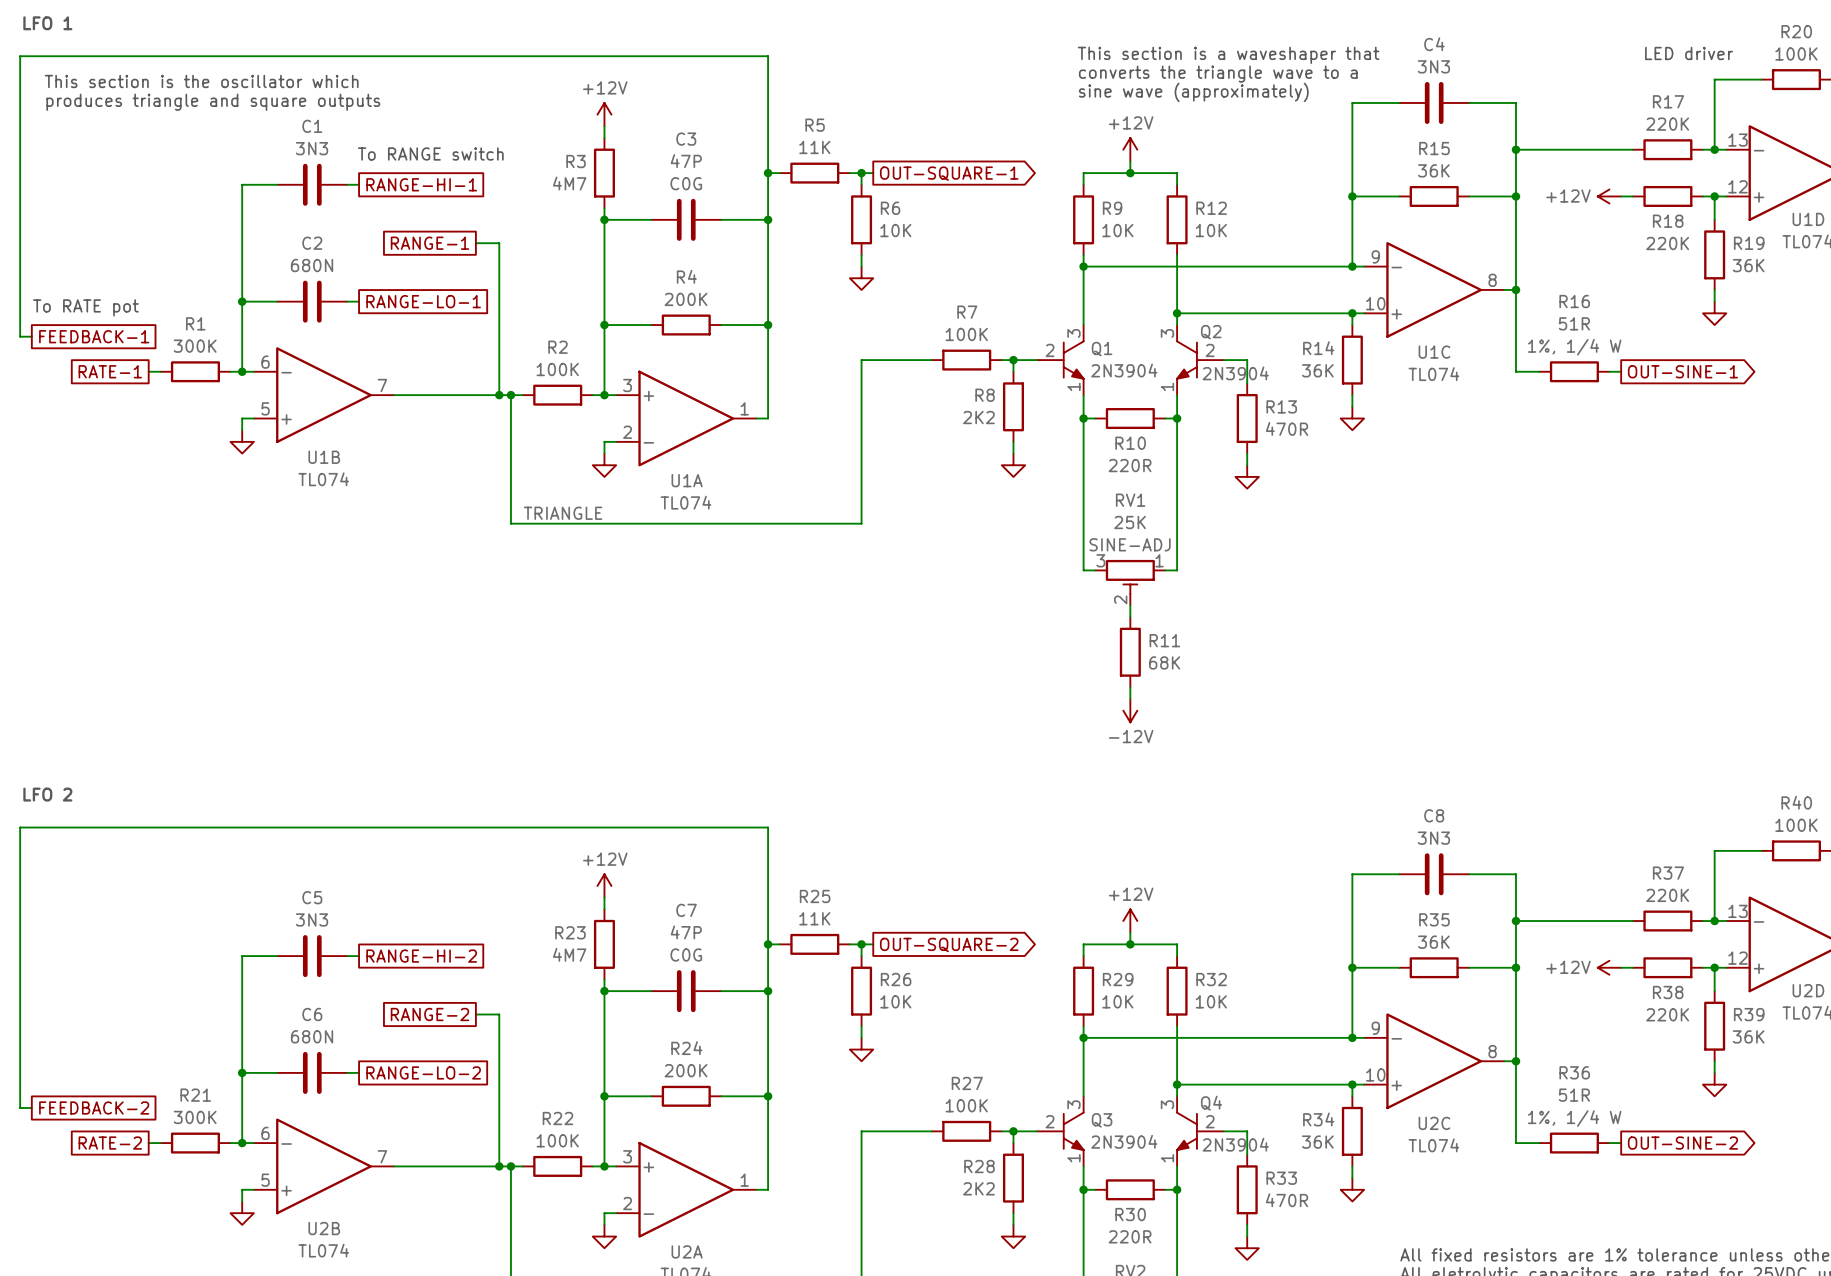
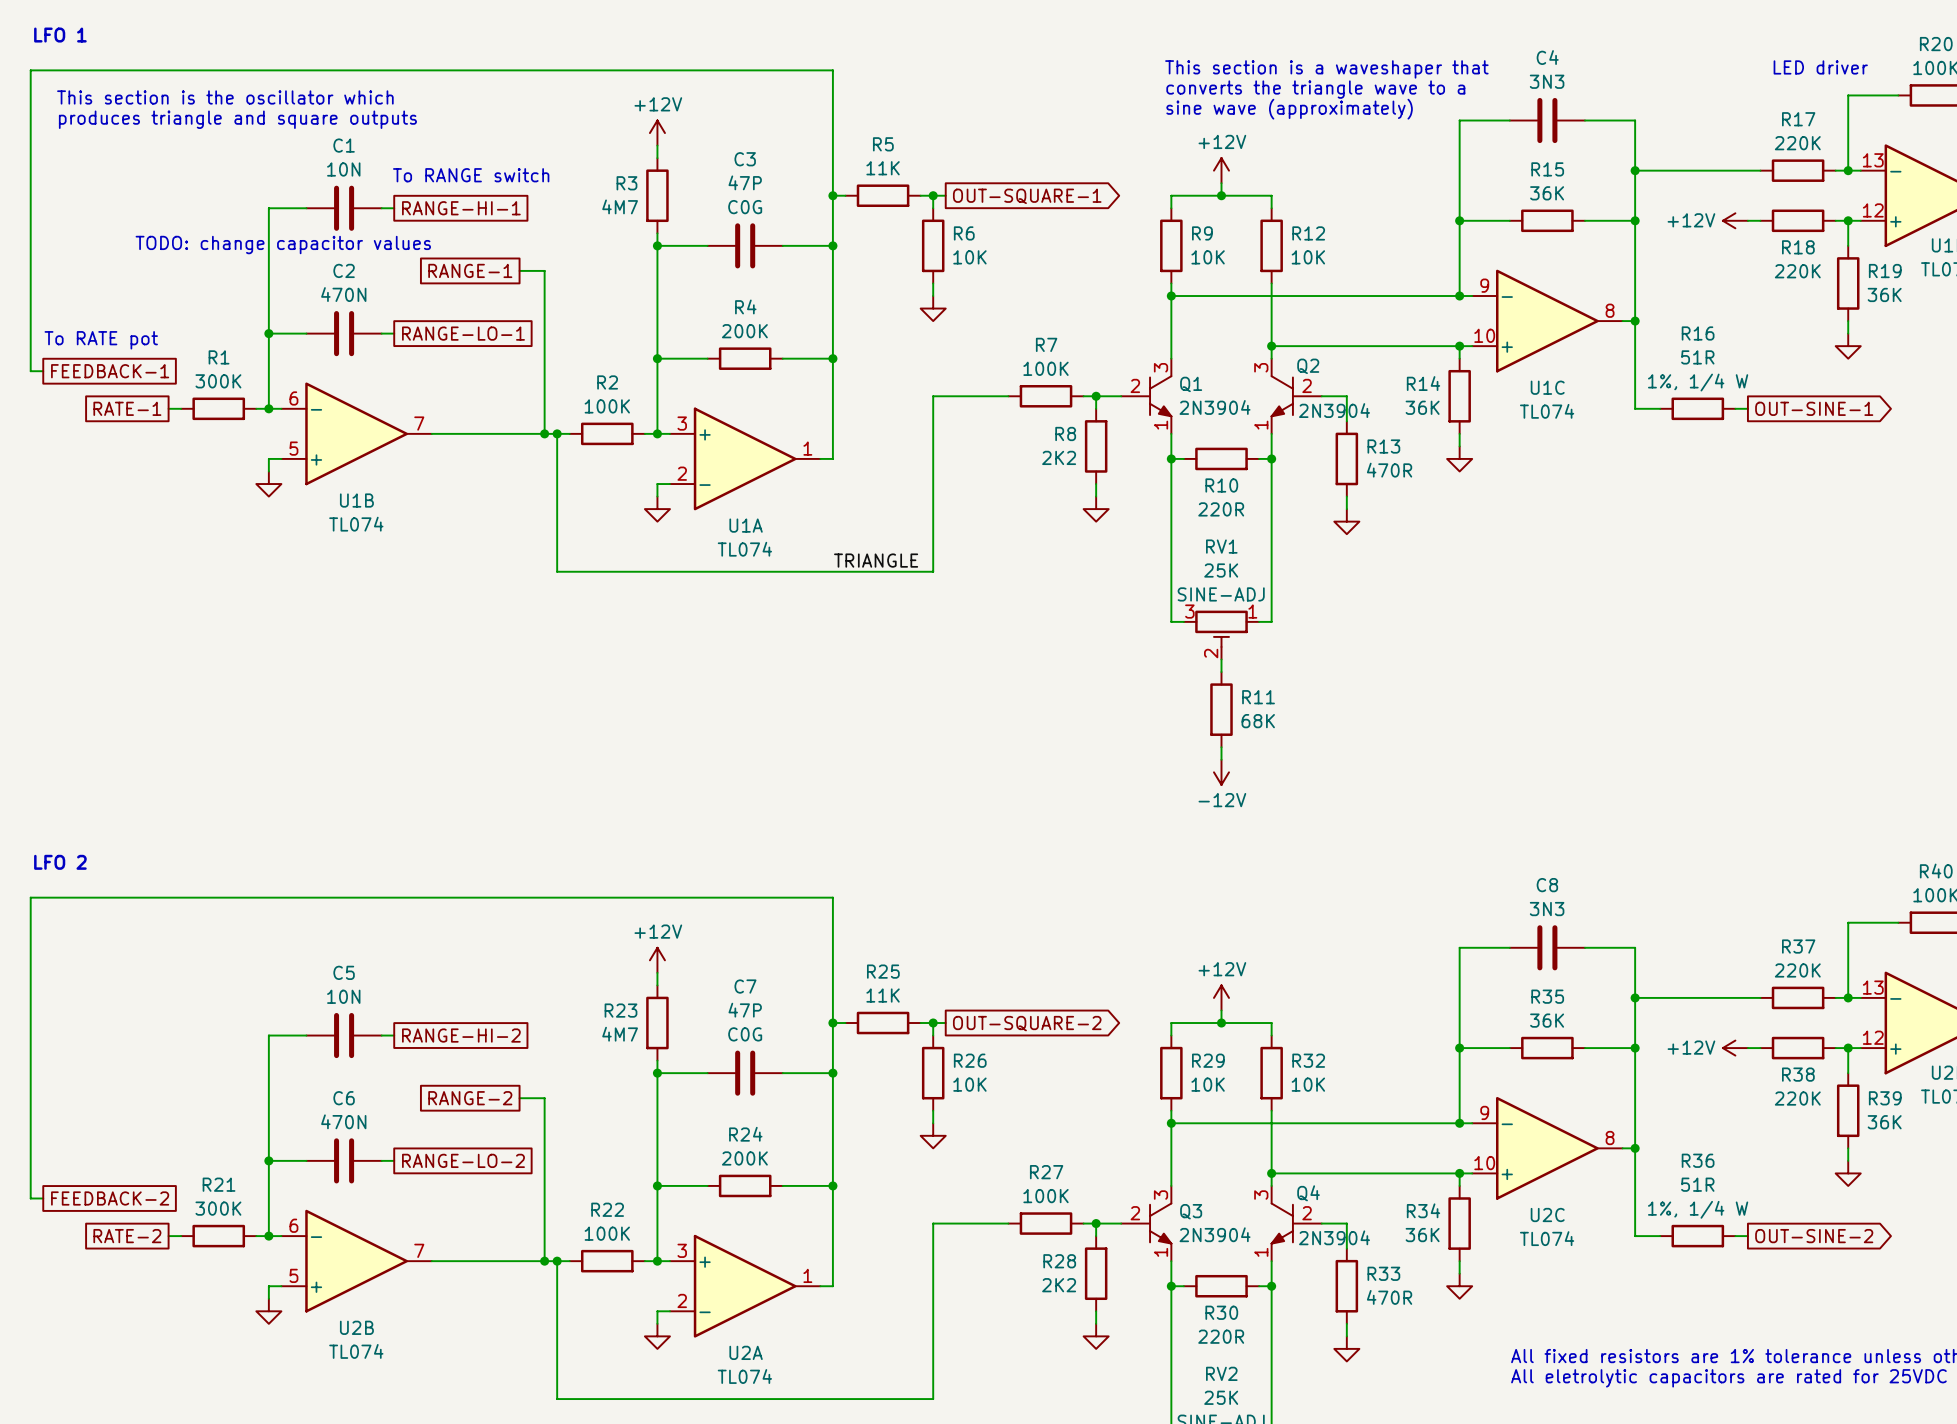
C1 value: 3N3 (312, 148) -> 10N (343, 169)
text: none -> TODO: change capacitor values (283, 245)
C2 value: 680N (312, 265) -> 470N (343, 294)
label: TRIANGLE (563, 513) -> none
label: none -> TRIANGLE (876, 560)
C5 value: 3N3 (312, 919) -> 10N (343, 996)
C6 value: 680N (312, 1036) -> 470N (343, 1121)

